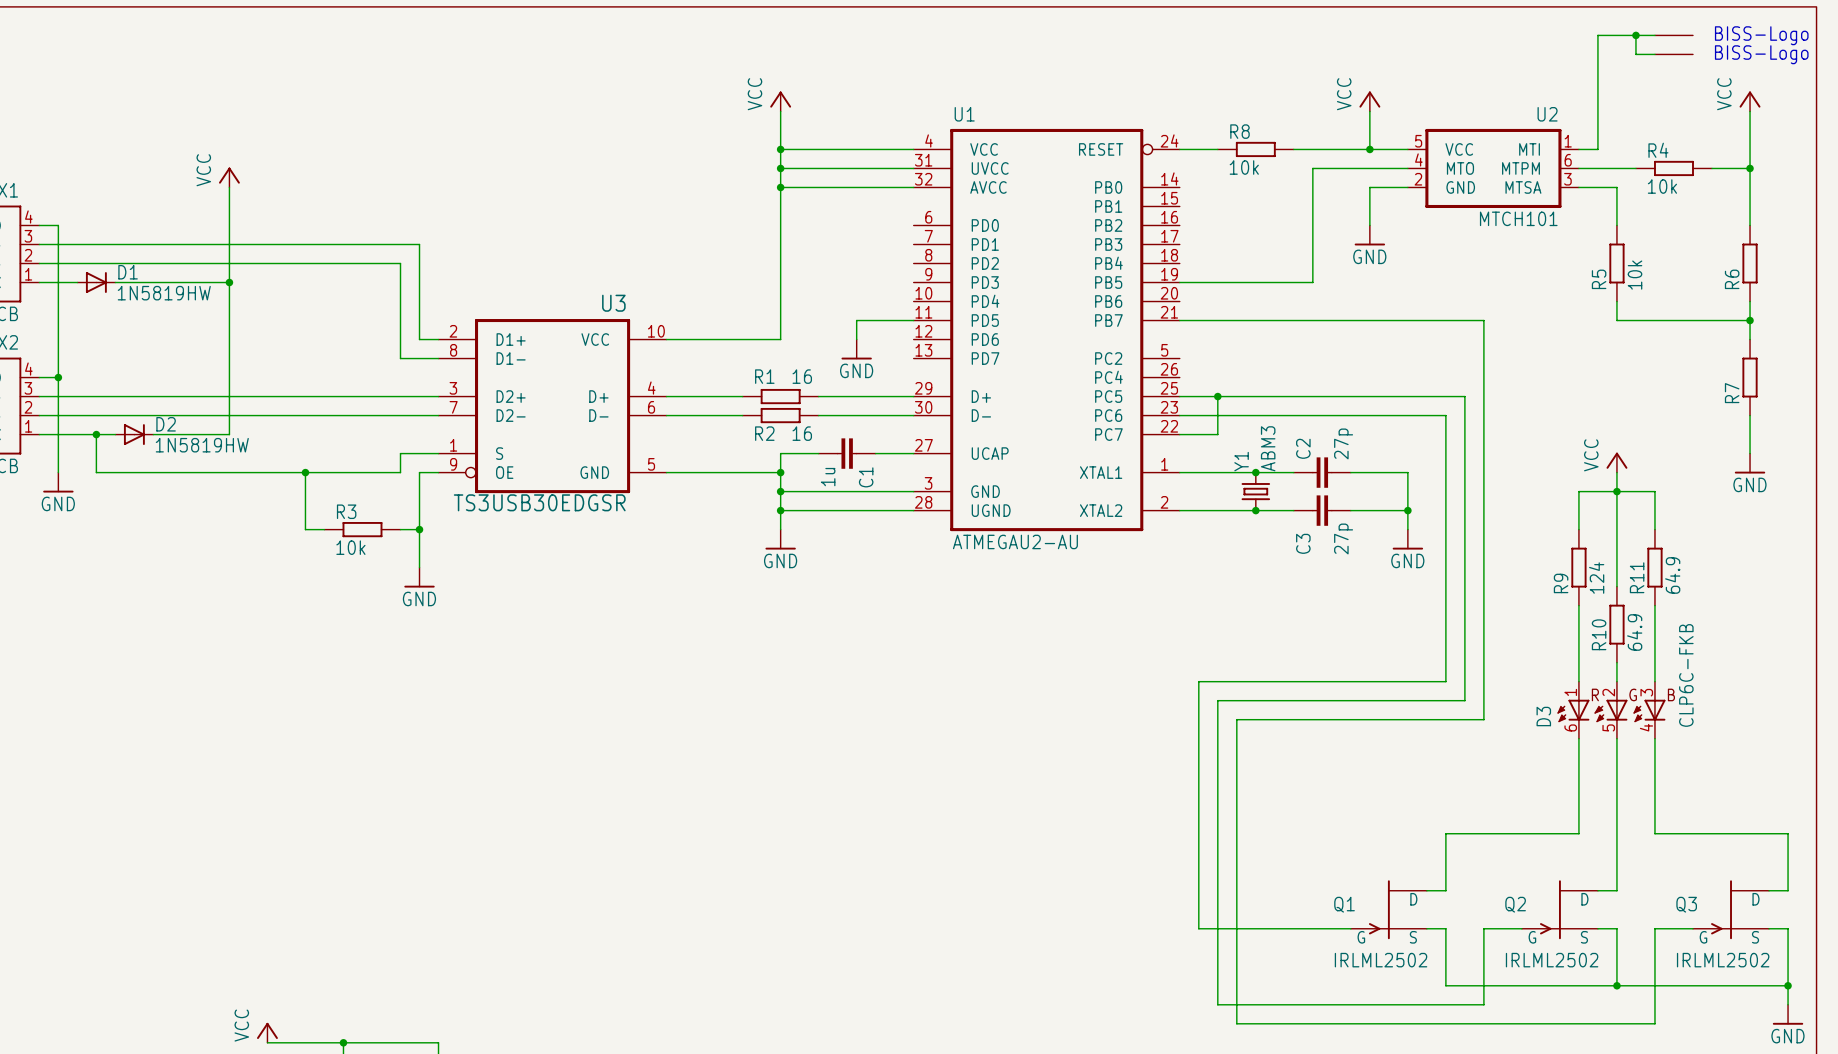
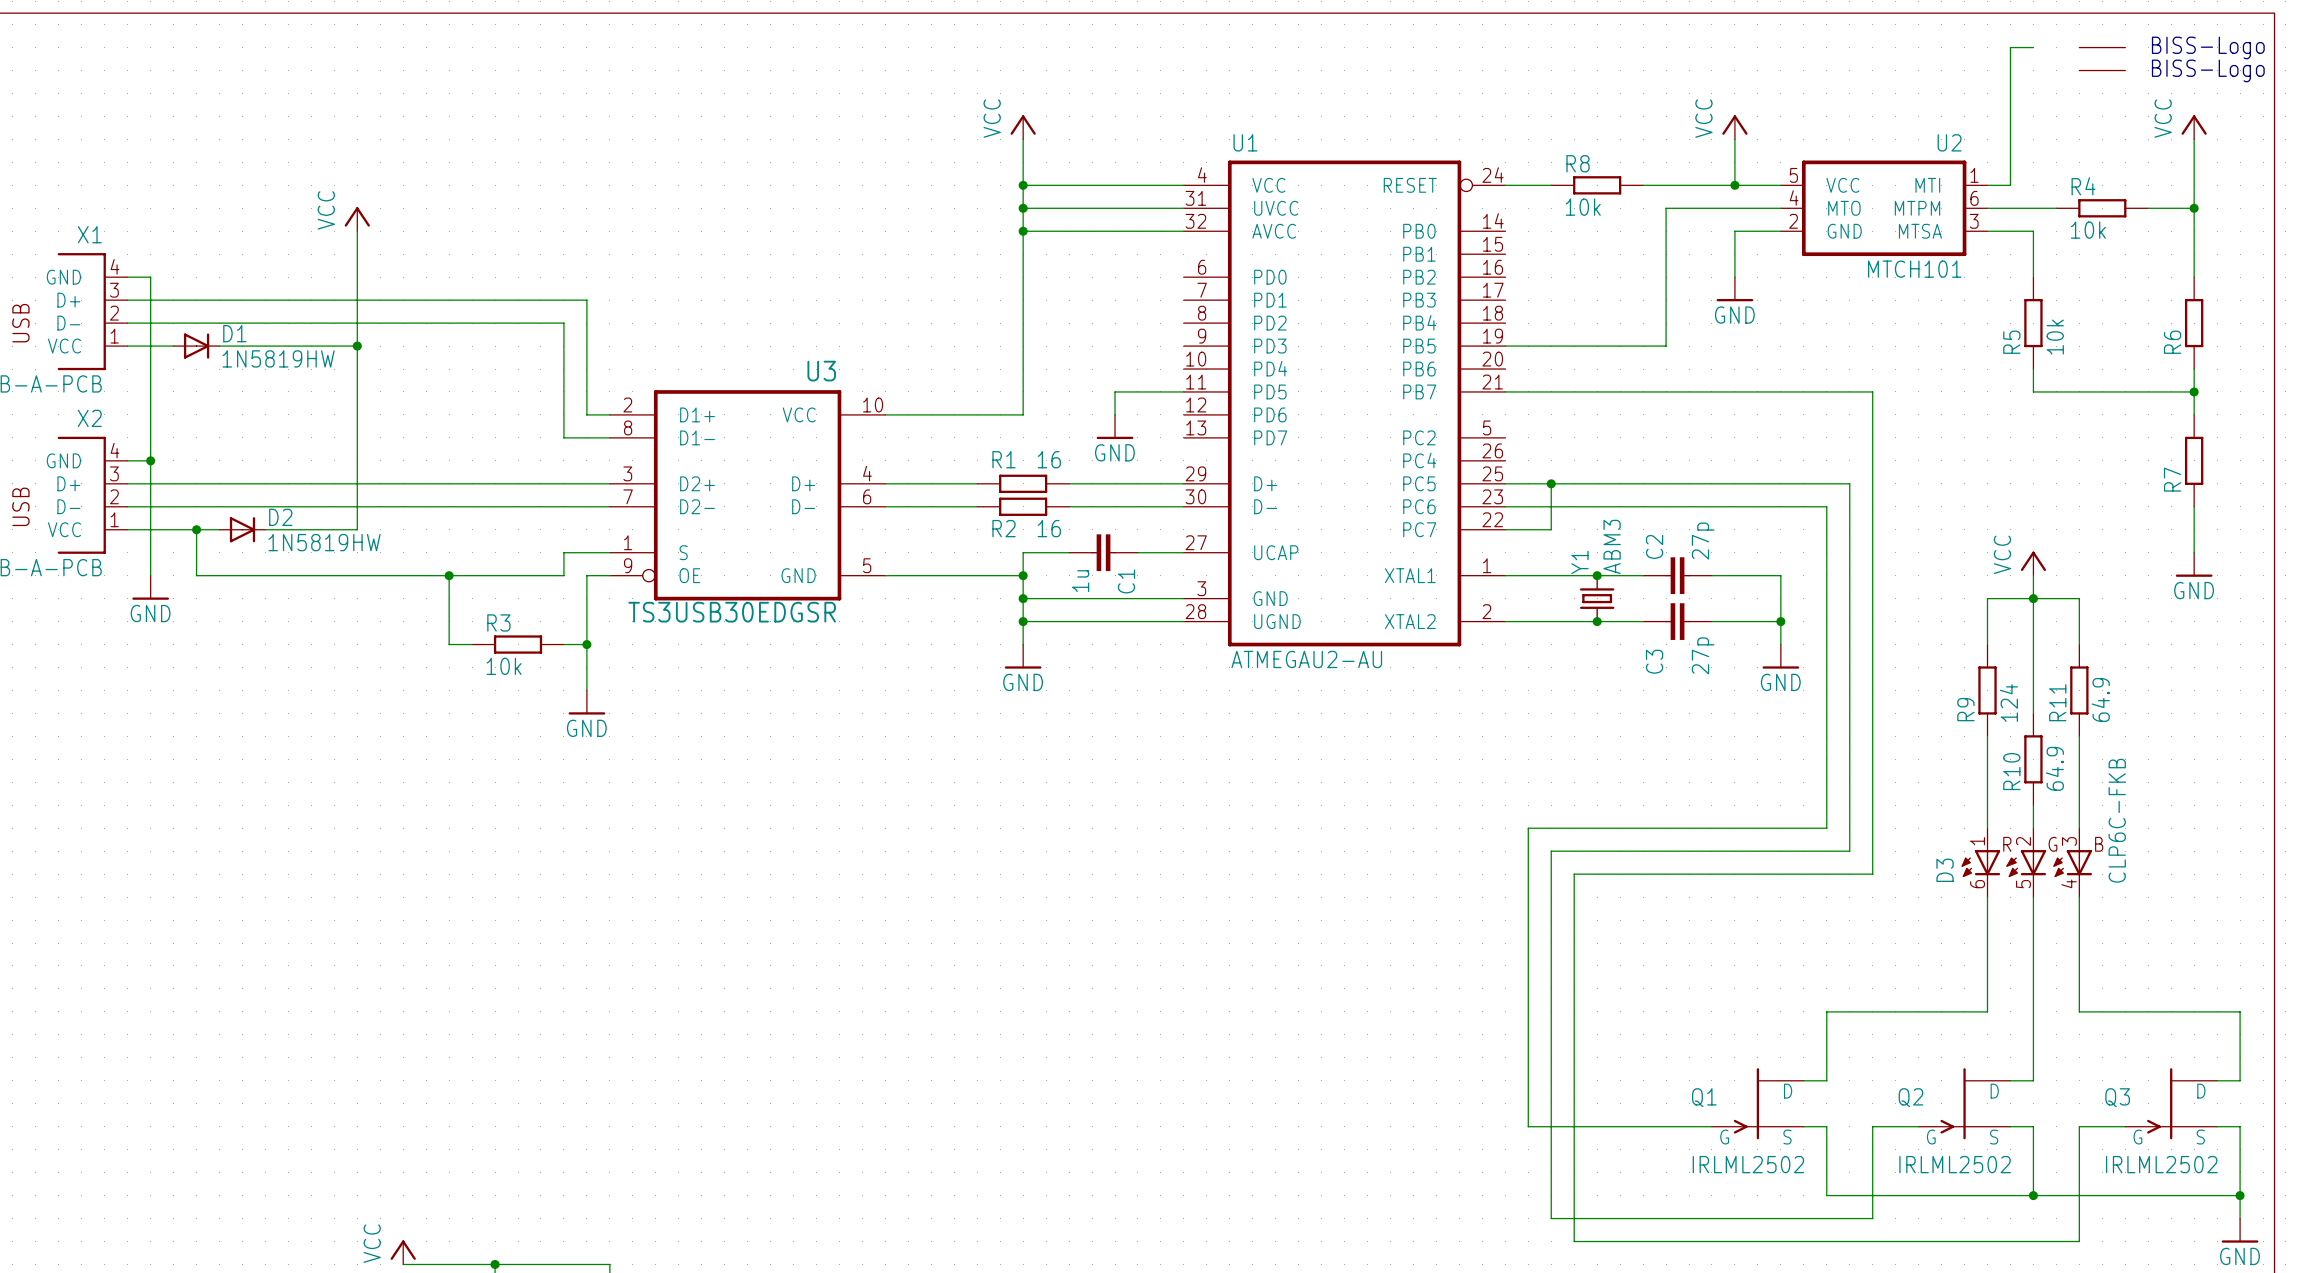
wire: (1616, 35) (1654, 35) -> none
wire: (1635, 35) (1635, 54) (1654, 54) -> none
junction: (1635, 35) -> none

